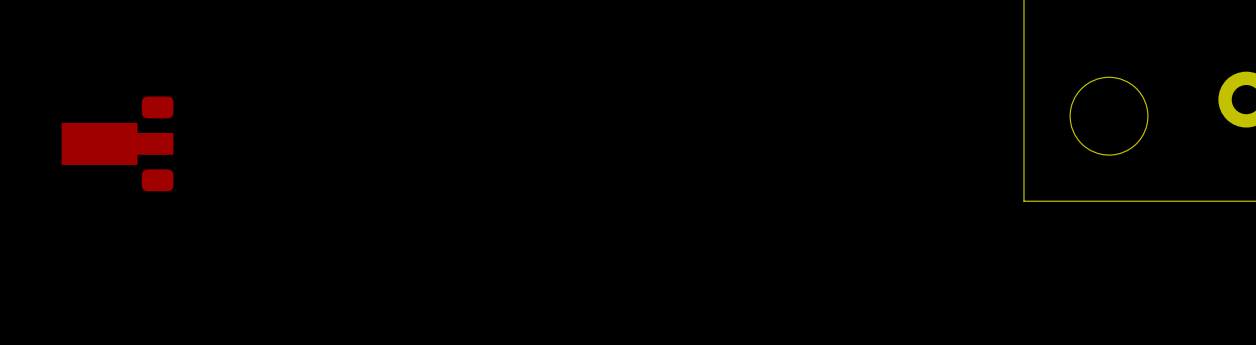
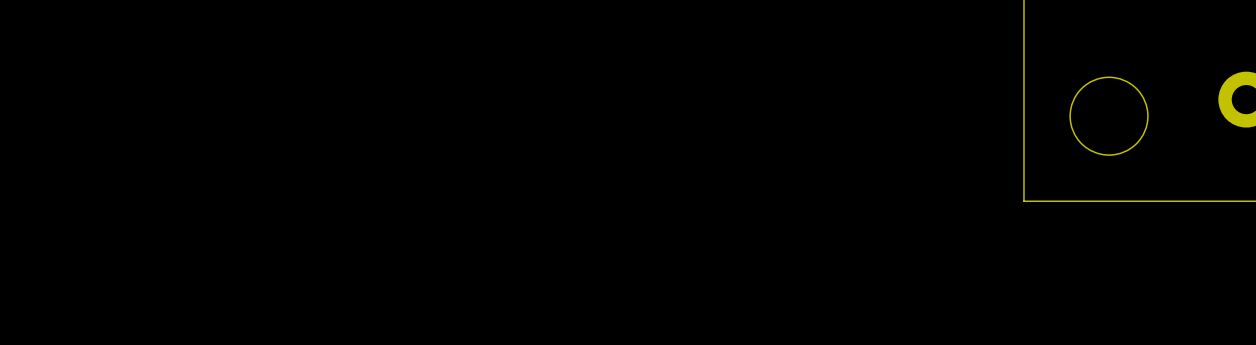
part: (117, 143) -> none

